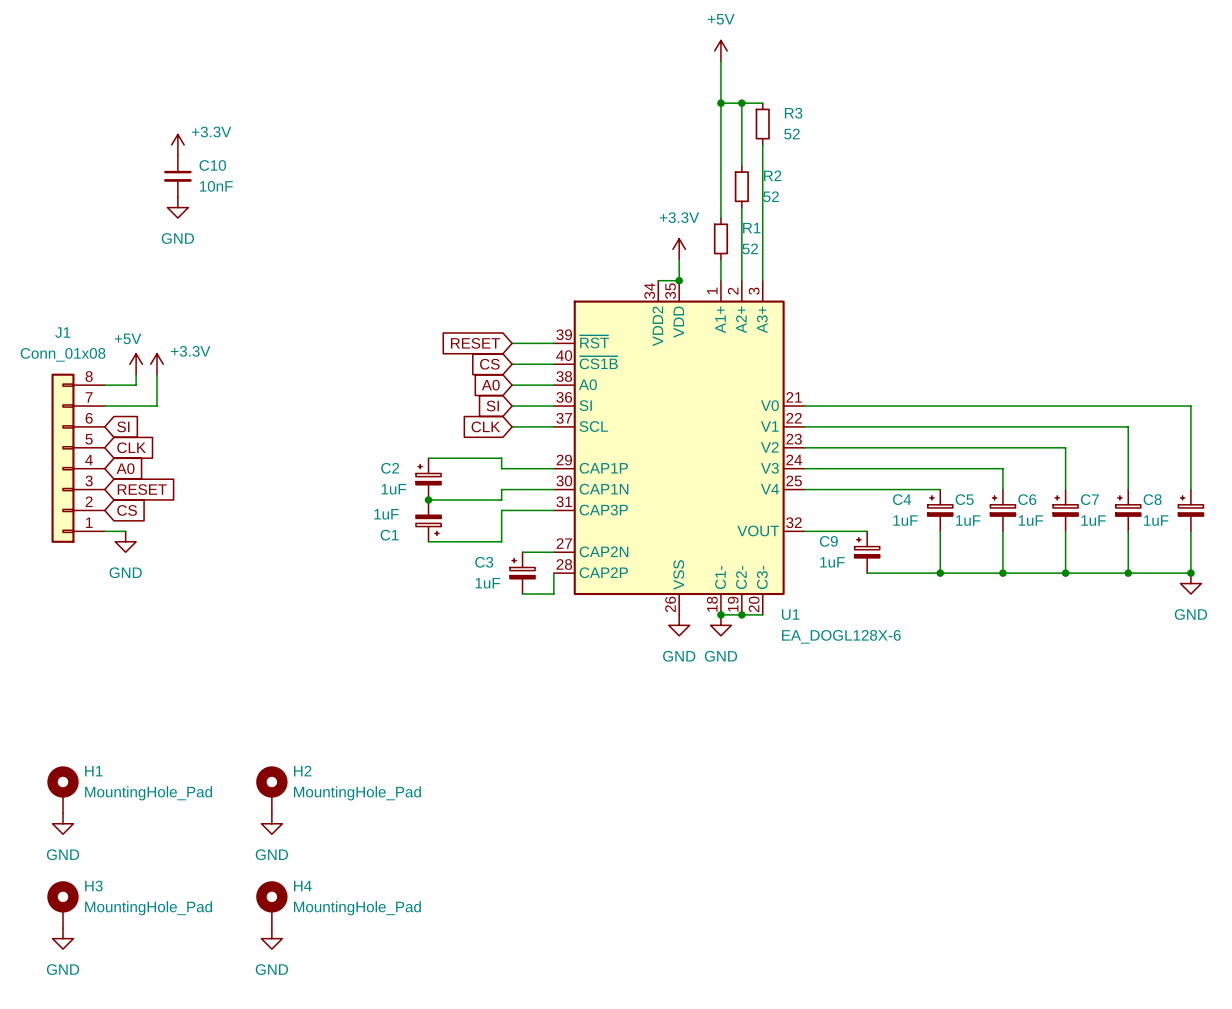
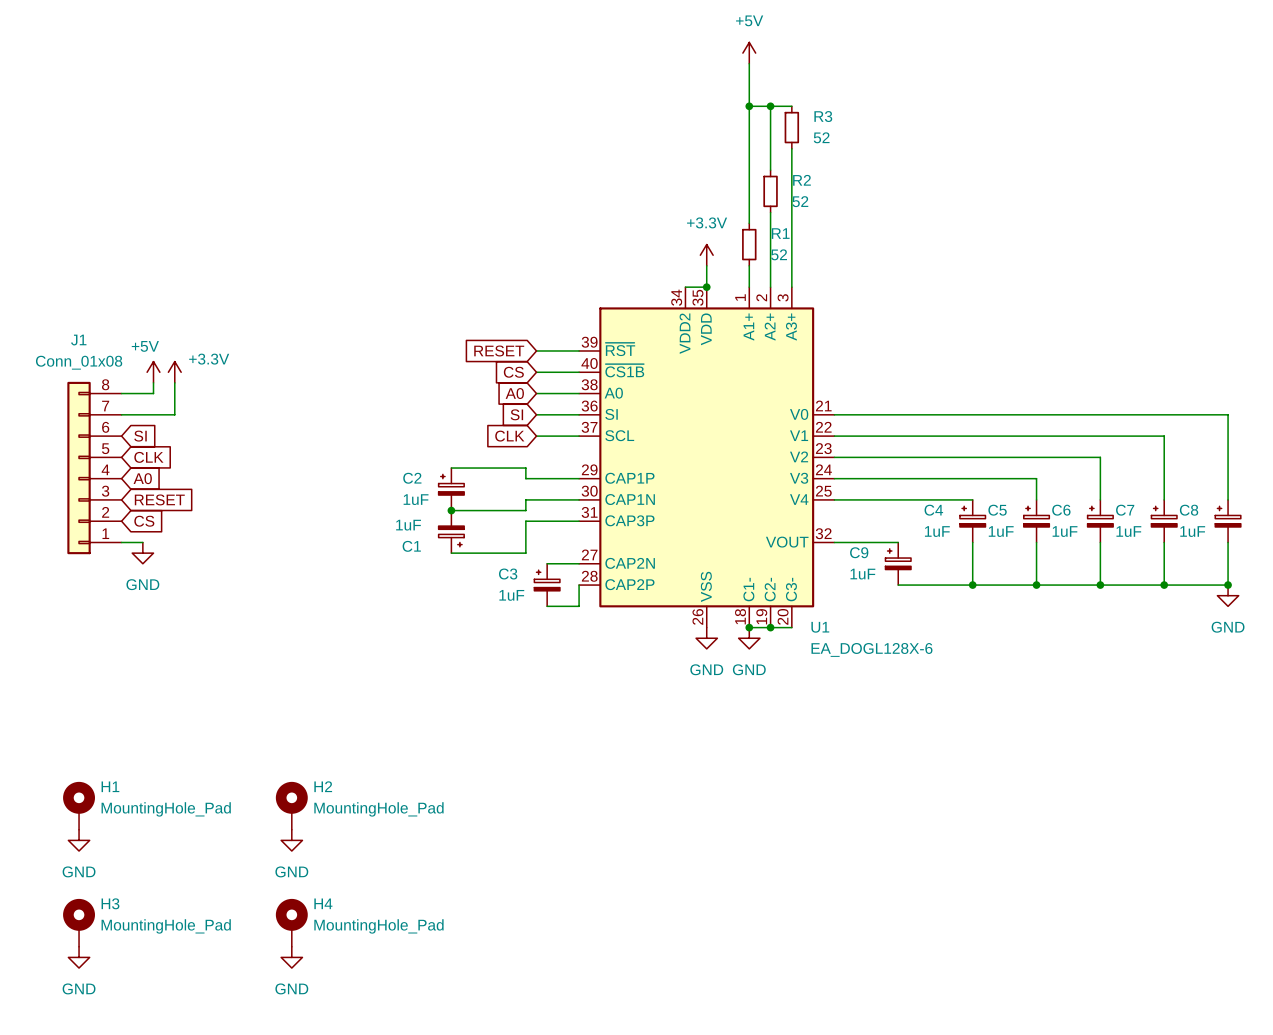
power symbol: +3.3V (177, 144) -> none
C10: 10nF (177, 176) -> none
power symbol: GND (177, 207) -> none

